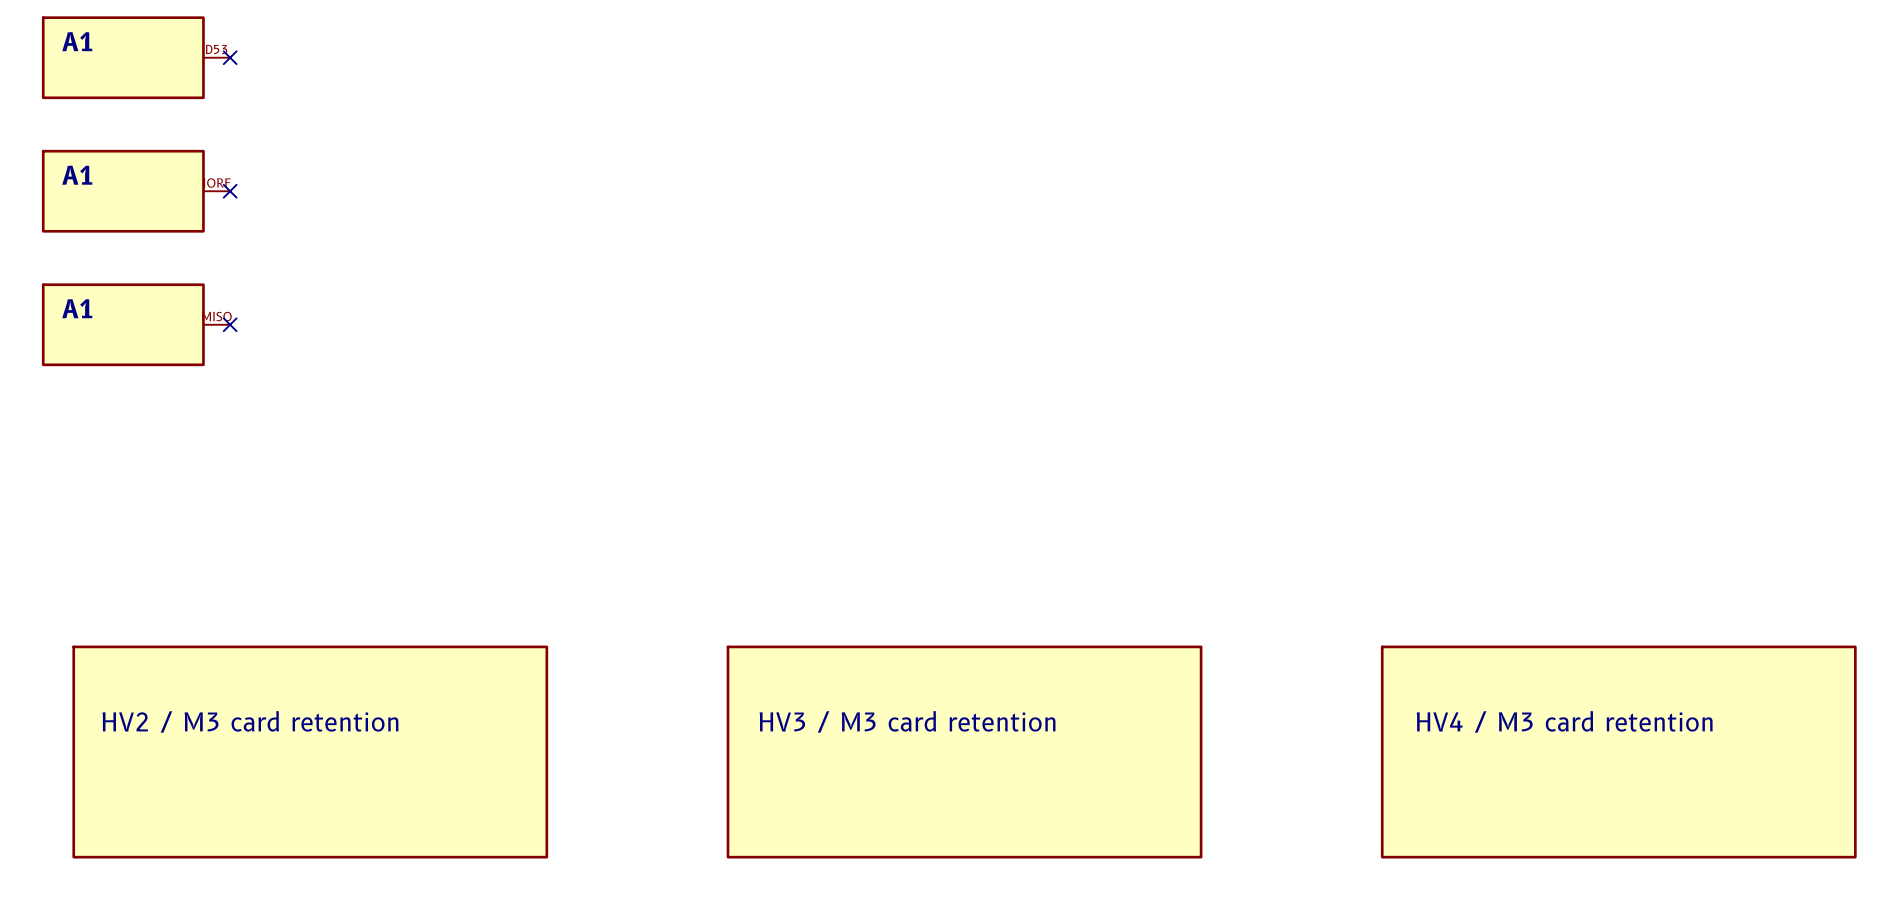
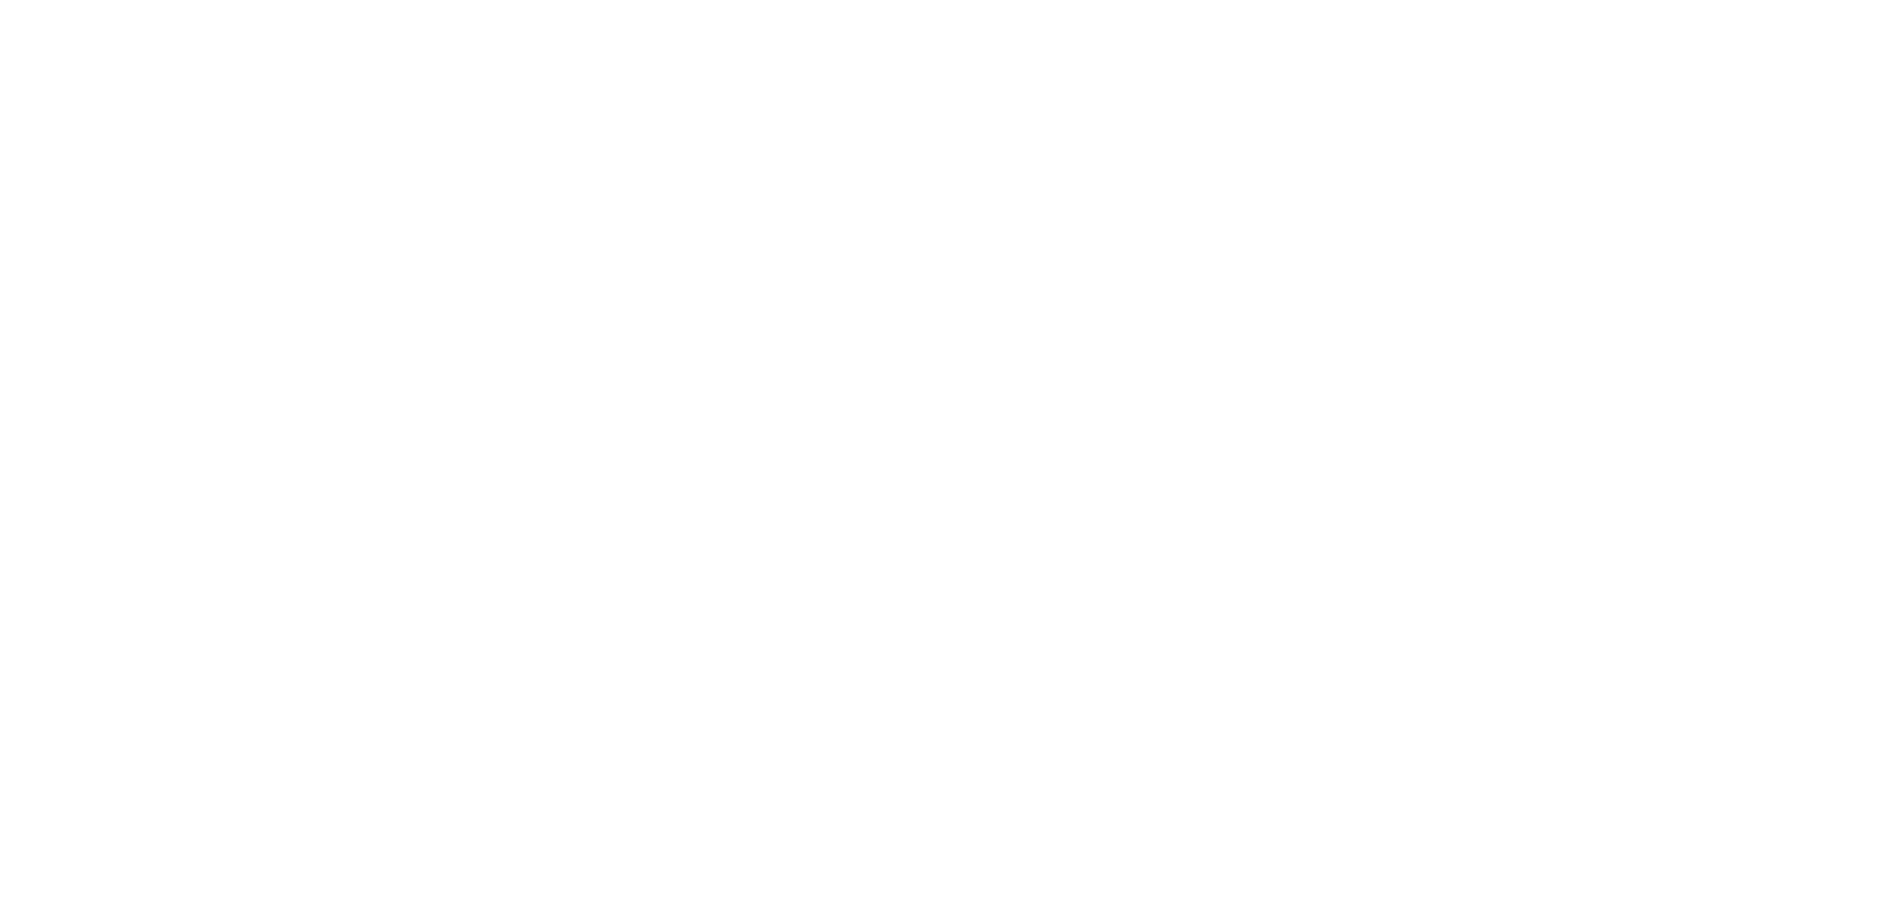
text: A1 (77, 41) -> none
part: (136, 57) -> none
no-connect mark: (230, 57) -> none
text: A1 (77, 175) -> none
part: (136, 191) -> none
no-connect mark: (230, 191) -> none
text: A1 (77, 308) -> none
part: (136, 324) -> none
no-connect mark: (230, 324) -> none
text: HV2 / M3 card retention (250, 721) -> none
text: HV3 / M3 card retention (907, 721) -> none
text: HV4 / M3 card retention (1564, 721) -> none
part: (310, 752) -> none
part: (964, 752) -> none
part: (1618, 752) -> none

